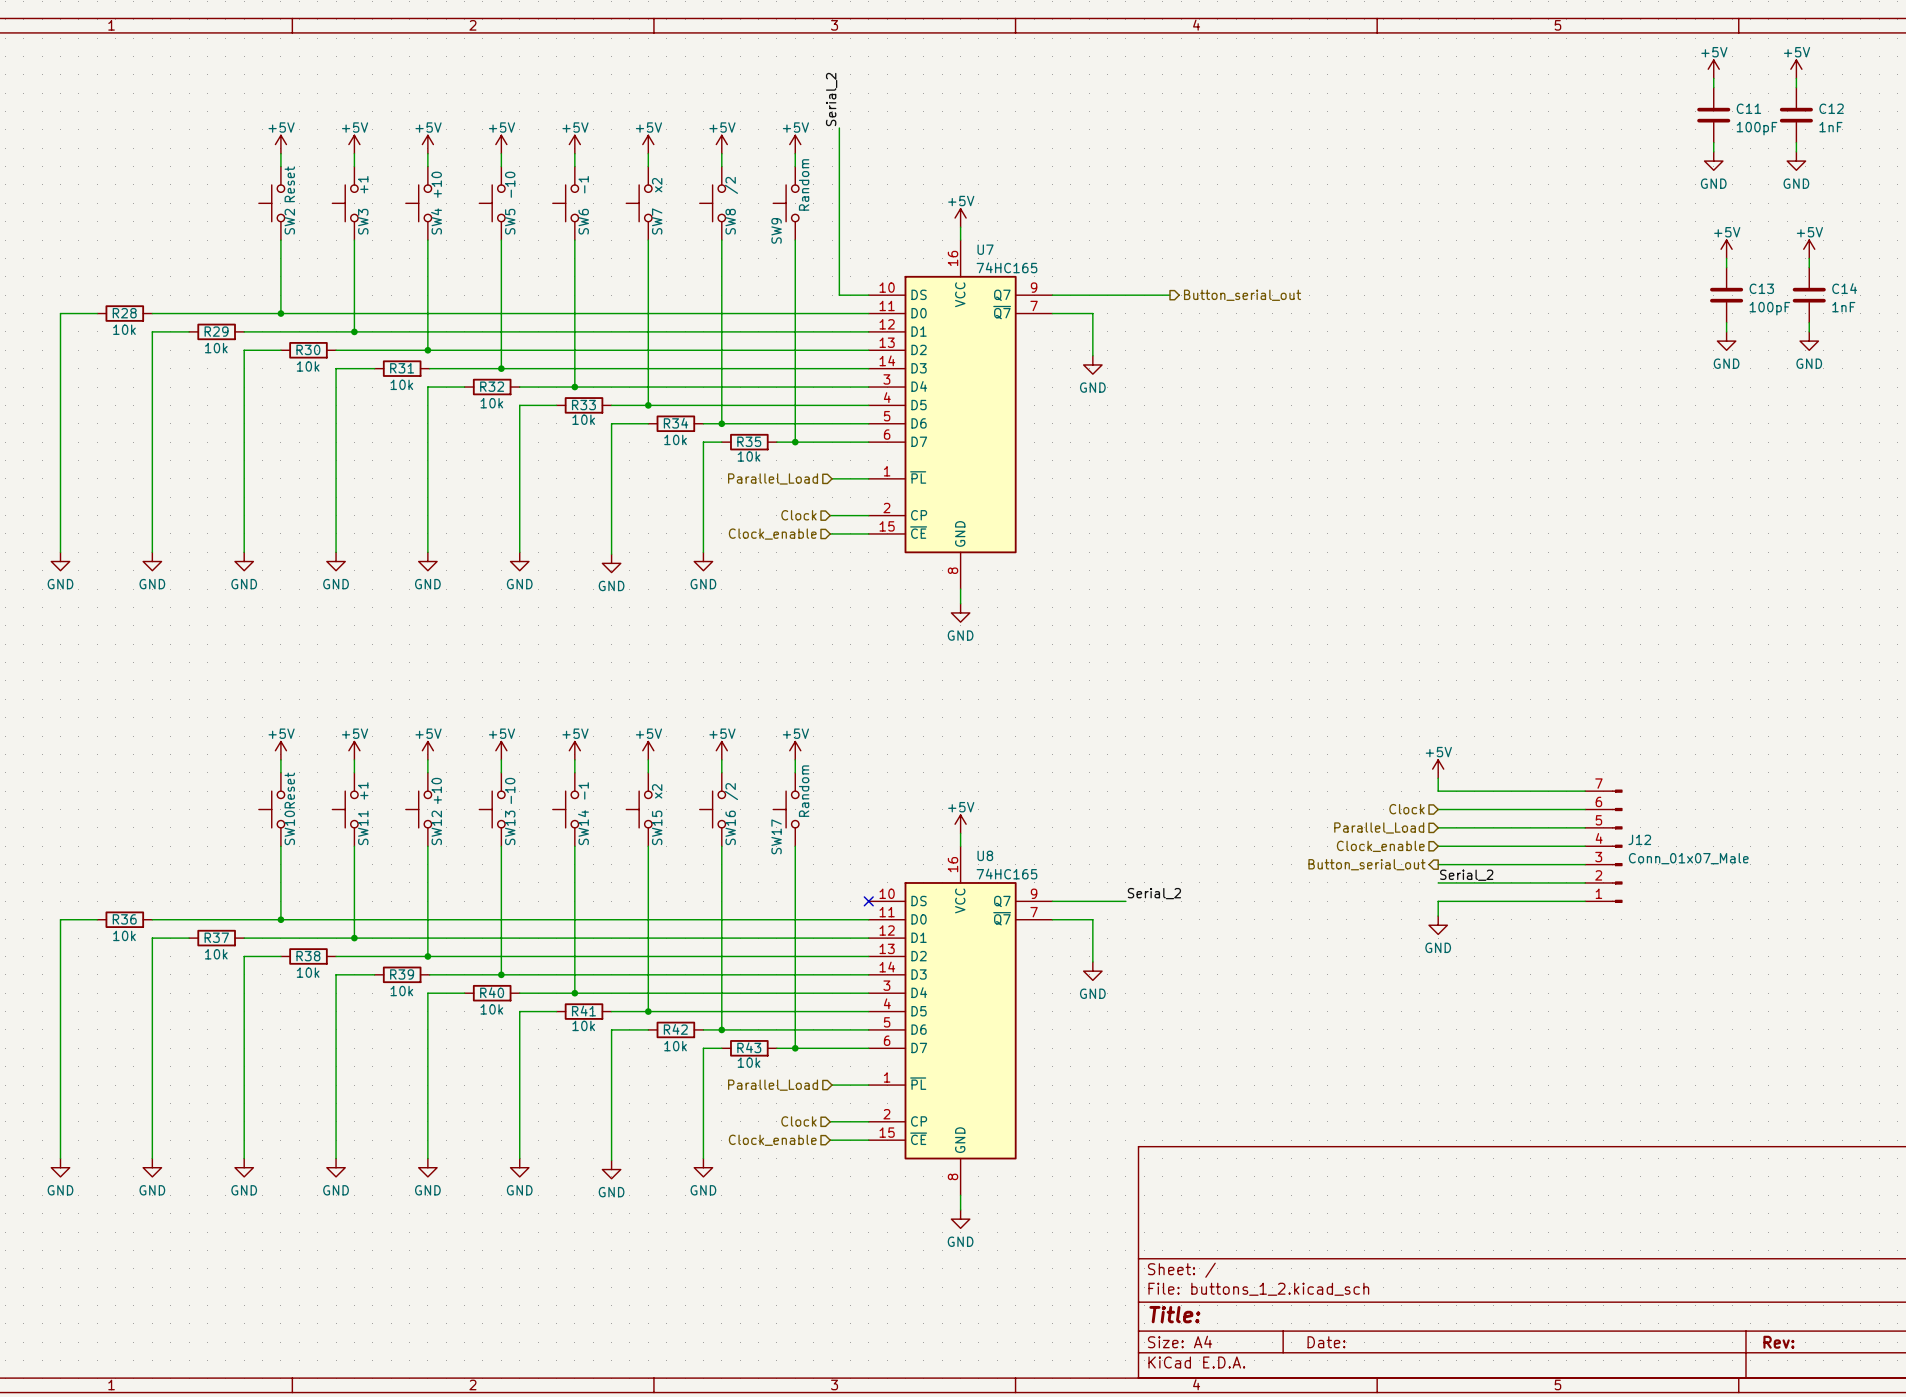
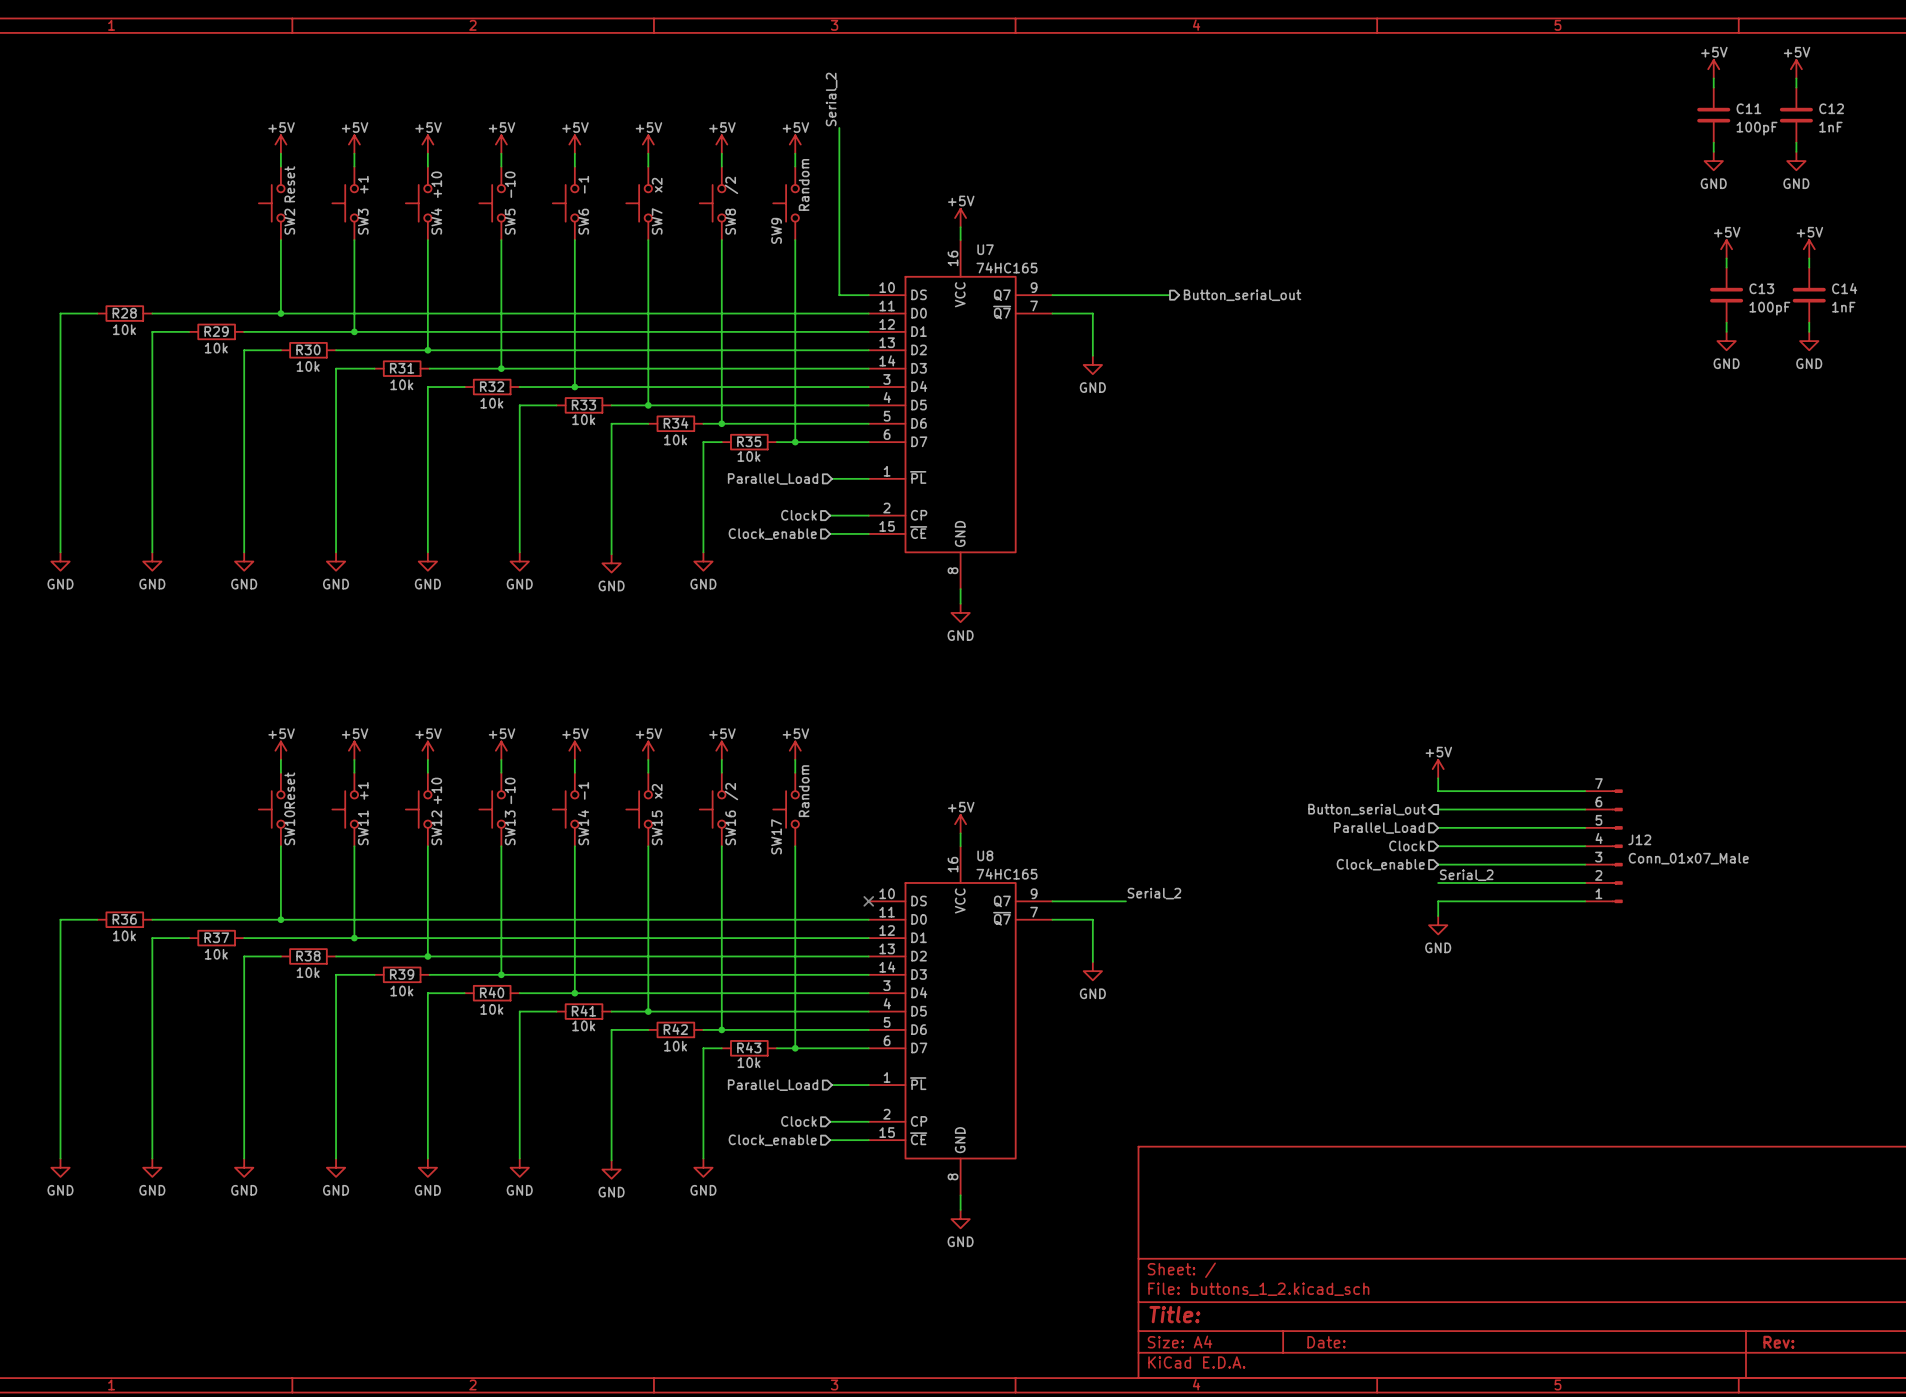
hierarchical label shape: input (1407, 809) -> output (1366, 809)
hierarchical label: Clock (1407, 809) -> Button_serial_out (1366, 809)
hierarchical label: Clock_enable (1380, 846) -> Clock (1407, 845)
hierarchical label shape: output (1366, 864) -> input (1380, 864)
hierarchical label: Button_serial_out (1366, 864) -> Clock_enable (1380, 864)

